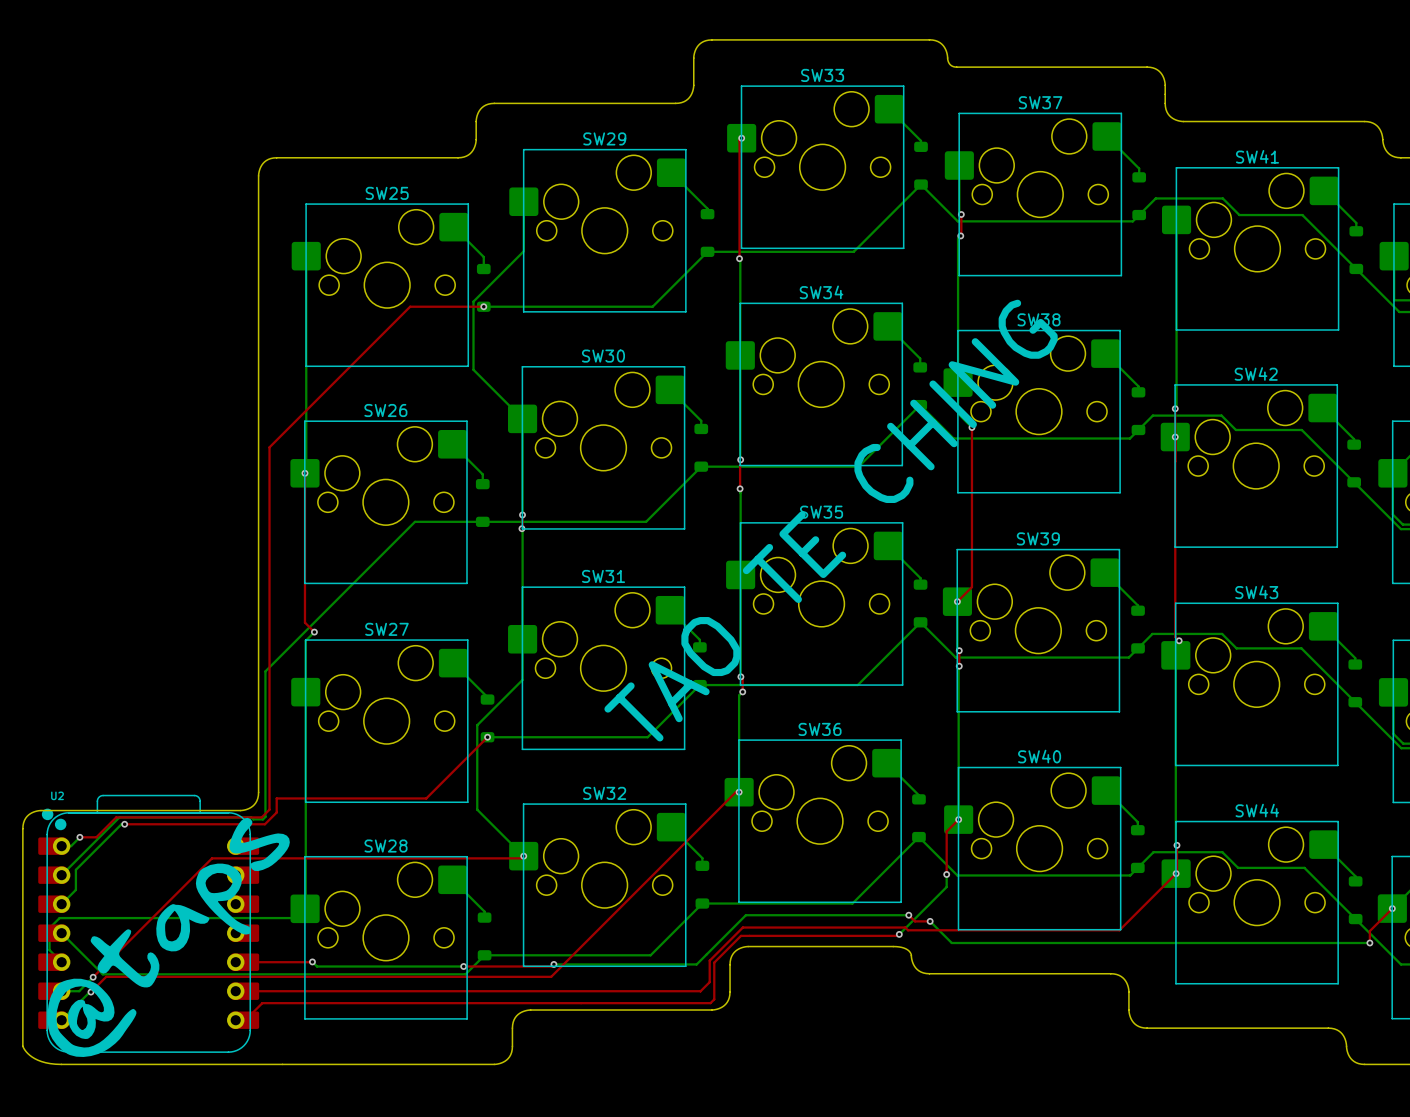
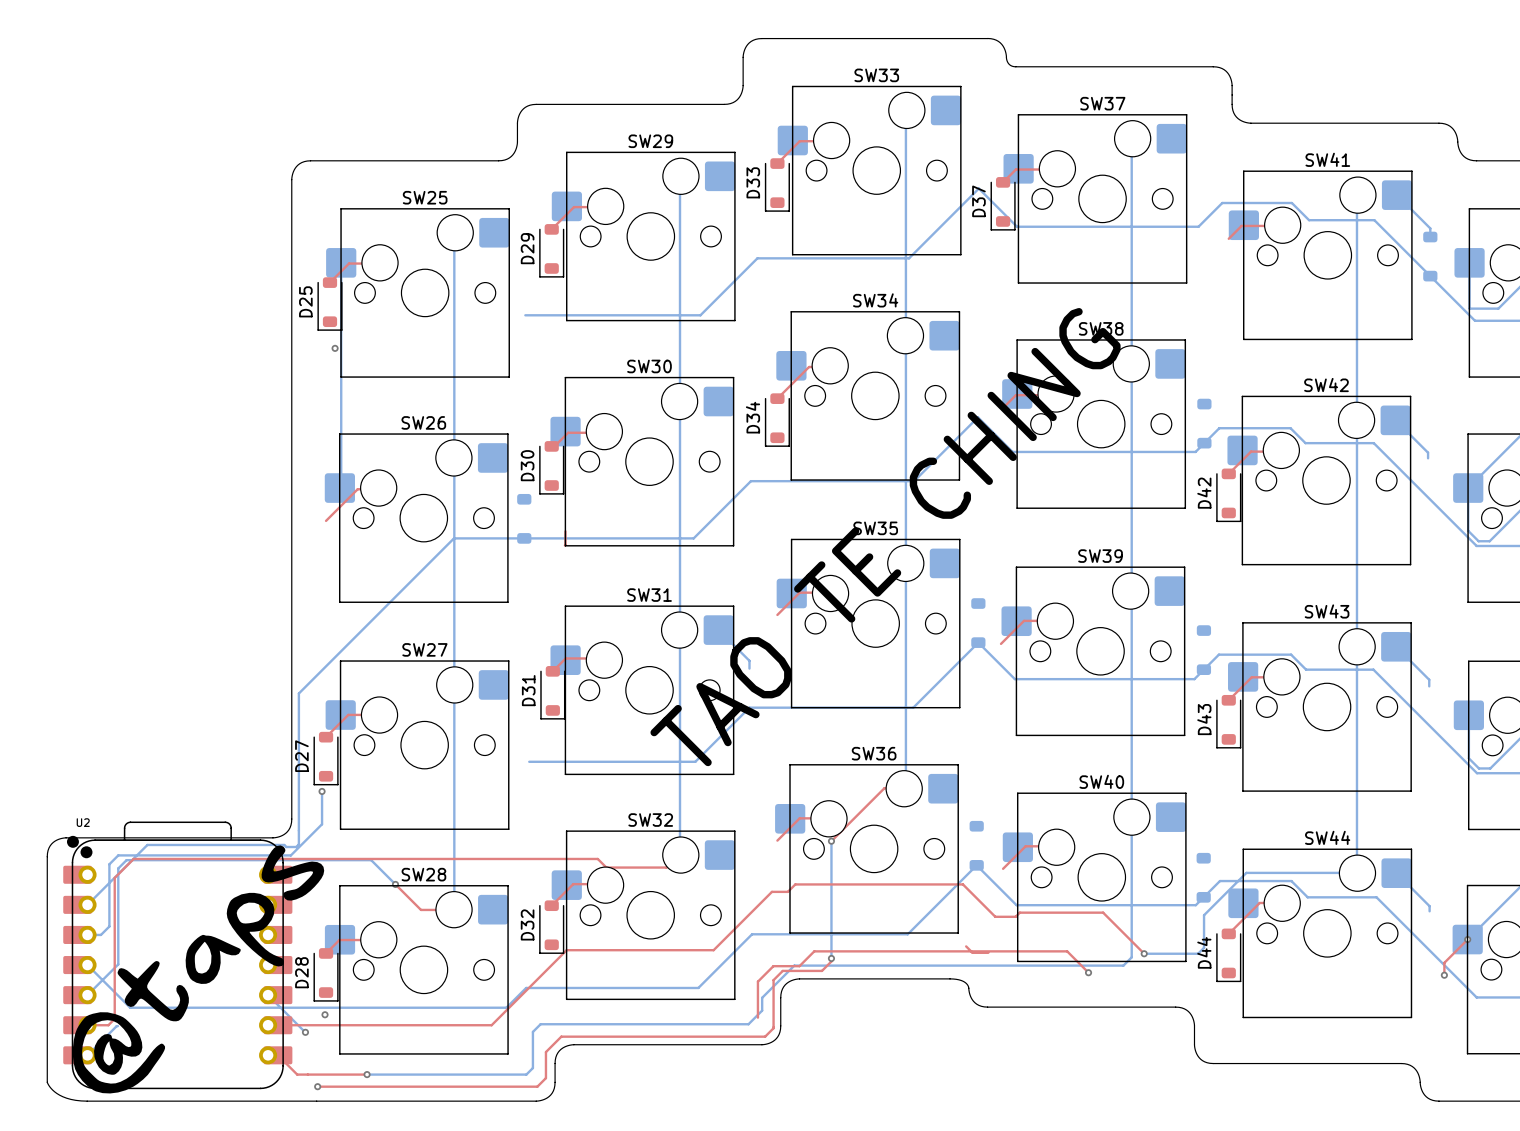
bottom track: none -> (905, 111) (905, 788)
bottom track: (889, 109) (921, 140) (921, 146) -> none
bottom track: (1107, 136) (1139, 168) (1139, 177) -> none
bottom track: none -> (1131, 139) (1131, 957) (1123, 965) (794, 965) (762, 997) (762, 1010) (748, 1024) (540, 1024) (532, 1031) (532, 1068) (526, 1074) (367, 1074)
top track: (741, 138) (739, 140) (739, 258) -> none
via: (741, 138) -> none
top track: none -> (830, 141) (799, 141) (777, 163)
D33 side: bottom (921, 165) -> top (777, 185)
bottom track: (959, 165) (959, 212) (961, 214) -> none
top track: none -> (1056, 169) (1015, 169) (1003, 182)
bottom track: (671, 172) (707, 208) (707, 214) -> none
bottom track: none -> (680, 177) (680, 854)
bottom track: none -> (1356, 195) (1356, 872) (1246, 872) (1204, 915) (1204, 947) (1198, 953) (1144, 953)
D37 side: bottom (1139, 196) -> top (1003, 203)
bottom track: (523, 201) (523, 251) (473, 301) (473, 369) (522, 418) (522, 514) -> none
top track: none -> (604, 207) (574, 207) (551, 229)
top track: (961, 214) (960, 235) -> none
via: (961, 214) -> none
bottom track: (1176, 219) (1175, 408) -> none
top track: none -> (1281, 225) (1241, 225) (1228, 238)
bottom track: none -> (454, 233) (454, 909)
bottom track: (453, 227) (483, 257) (483, 269) -> none
D29 side: bottom (707, 232) -> top (551, 250)
bottom track: (960, 235) (958, 238) (958, 413) (971, 427) -> none
via: (960, 235) -> none
top track: none -> (379, 263) (349, 263) (329, 282)
bottom track: (739, 258) (740, 459) -> none
via: (739, 258) -> none
D25 side: bottom (483, 287) -> top (329, 304)
top track: (483, 306) (410, 306) (269, 447) (269, 809) (261, 817) (116, 817) (96, 837) (79, 837) -> none
via: (483, 306) -> none
bottom track: (887, 326) (920, 358) (920, 367) -> none
via: none -> (335, 348)
bottom track: (1105, 353) (1138, 386) (1138, 392) -> none
top track: none -> (830, 366) (809, 366) (777, 398)
top track: none -> (1056, 395) (1015, 395) (1003, 408)
D34 side: bottom (920, 386) -> top (777, 420)
bottom track: (670, 389) (701, 420) (701, 428) -> none
top track: (1175, 408) (1175, 636) (1179, 640) -> none
via: (1175, 408) -> none
top track: none -> (604, 432) (568, 432) (554, 446) (551, 446)
top track: (971, 427) (971, 587) (957, 601) -> none
via: (971, 427) -> none
via: (1175, 437) -> none
top track: none -> (1281, 451) (1251, 451) (1228, 473)
bottom track: (452, 444) (482, 474) (482, 484) -> none
D30 side: bottom (701, 447) -> top (551, 467)
top track: (740, 459) (740, 488) -> none
via: (740, 459) -> none
D42 side: bottom (1354, 463) -> top (1228, 495)
top track: (304, 473) (304, 622) (314, 632) -> none
via: (304, 473) -> none
top track: none -> (379, 489) (357, 489) (326, 520)
bottom track: (740, 488) (740, 676) -> none
via: (740, 488) -> none
via: (522, 514) -> none
bottom track: (521, 528) (522, 679) (477, 725) (477, 809) (523, 856) -> none
via: (521, 528) -> none
bottom track: (888, 545) (920, 578) (920, 584) -> none
bottom track: (1105, 572) (1138, 605) (1138, 610) -> none
top track: none -> (830, 592) (799, 592) (777, 614)
bottom track: (957, 601) (957, 648) (959, 650) -> none
via: (957, 601) -> none
top track: none -> (1056, 620) (1024, 620) (1001, 643)
bottom track: (314, 632) (305, 640) (305, 908) (295, 918) (59, 918) (49, 928) (49, 950) (61, 962) -> (395, 884) (371, 860) (126, 860) (118, 868) (118, 964) (87, 995)
via: (314, 632) -> none
top track: none -> (604, 658) (565, 658) (552, 671)
bottom track: (1179, 640) (1175, 644) (1176, 845) -> none
via: (1179, 640) -> none
top track: (959, 650) (959, 666) -> none
via: (959, 650) -> none
top track: none -> (1281, 677) (1251, 677) (1228, 700)
bottom track: (453, 663) (487, 697) (487, 699) -> none
D31 side: bottom (699, 666) -> top (552, 692)
bottom track: (959, 666) (958, 819) -> none
via: (959, 666) -> none
top track: (740, 676) (742, 678) (742, 691) -> none
via: (740, 676) -> none
D43 side: bottom (1355, 683) -> top (1228, 721)
bottom track: (742, 691) (739, 695) (739, 792) -> none
via: (742, 691) -> none
top track: none -> (379, 714) (348, 714) (326, 737)
D27 side: bottom (487, 718) -> top (326, 758)
top track: (487, 737) (426, 798) (276, 798) (276, 812) (264, 824) (124, 824) -> none
via: (487, 737) -> none
top track: none -> (905, 788) (884, 788) (831, 841)
bottom track: (886, 763) (918, 795) (918, 799) -> none
via: none -> (322, 791)
bottom track: (1106, 790) (1137, 822) (1137, 830) -> none
top track: none -> (830, 818) (799, 818) (777, 840)
top track: (739, 792) (735, 792) (551, 976) (106, 976) (90, 992) -> none
via position: (739, 792) -> (831, 841)
bottom track: none -> (831, 841) (831, 958)
top track: none -> (1056, 846) (1025, 846) (1003, 868)
top track: (958, 819) (946, 831) (946, 874) -> none
via: (958, 819) -> none
bottom track: (124, 824) (121, 824) (75, 869) (75, 889) (61, 904) -> (322, 791) (322, 824) (290, 855) (118, 855) (109, 864) (109, 926) (100, 934) (87, 934)
via: (124, 824) -> none
top track: none -> (680, 854) (666, 867) (606, 867) (597, 858) (133, 858) (114, 877) (114, 1018) (108, 1025) (87, 1025)
bottom track: (671, 827) (702, 858) (702, 865) -> none
bottom track: (79, 837) (71, 846) (61, 846) -> none
via: (79, 837) -> none
top track: (1176, 845) (1176, 872) (1119, 930) (908, 930) (905, 927) (742, 927) (709, 960) (709, 982) (700, 991) -> none
via: (1176, 845) -> none
top track: none -> (395, 884) (421, 909) (454, 909)
via: none -> (395, 884)
top track: none -> (604, 884) (573, 884) (551, 905)
top track: (523, 856) (521, 858) (212, 858) (93, 977) -> none
via: (523, 856) -> none
via: (1176, 873) -> none
top track: none -> (1281, 902) (1259, 902) (1228, 933)
bottom track: (946, 874) (946, 887) (899, 934) -> none
via: (946, 874) -> none
bottom track: (452, 879) (484, 911) (484, 917) -> none
D32 side: bottom (702, 884) -> top (551, 927)
D44 side: bottom (1355, 900) -> top (1228, 955)
top track: none -> (379, 940) (339, 940) (326, 953)
bottom track: (908, 915) (745, 915) (696, 964) (553, 964) -> none
via: (908, 915) -> none
bottom track: (930, 921) (951, 943) (1369, 943) -> none
via: (930, 921) -> none
via: none -> (1144, 953)
top track: none -> (831, 958) (831, 961) (821, 970) (782, 970) (773, 980) (773, 1028) (765, 1036) (561, 1036) (545, 1052) (545, 1078) (537, 1086) (317, 1086)
via: none -> (831, 958)
top track: (899, 934) (741, 935) (714, 962) (714, 999) (710, 1003) (262, 1003) (245, 1020) (235, 1020) -> none
via: (899, 934) -> none
D28 side: bottom (484, 936) -> top (326, 974)
top track: none -> (1088, 972) (1067, 951) (814, 951) (799, 966) (773, 966) (757, 981) (757, 1017)
via: none -> (1088, 972)
top track: (312, 961) (235, 962) -> none
bottom track: (312, 961) (317, 966) (463, 966) -> none
via: (312, 961) -> none
bottom track: none -> (268, 995) (305, 1032)
top track: (553, 964) (551, 966) (463, 966) -> none
via: (553, 964) -> none
via: (463, 966) -> none
bottom track: (93, 977) (79, 991) (61, 991) -> none
via: (93, 977) -> none
via: none -> (325, 1014)
top track: (451, 991) (700, 991) -> (491, 1025) (566, 950) (713, 950) (771, 891) (787, 891) (795, 884) (962, 884) (995, 916) (1015, 916) (1019, 912) (1103, 912) (1144, 953)
via: (90, 992) -> none
via: none -> (305, 1032)
top track: none -> (277, 1055) (297, 1074) (367, 1074)
via: none -> (367, 1074)
via: none -> (317, 1086)

